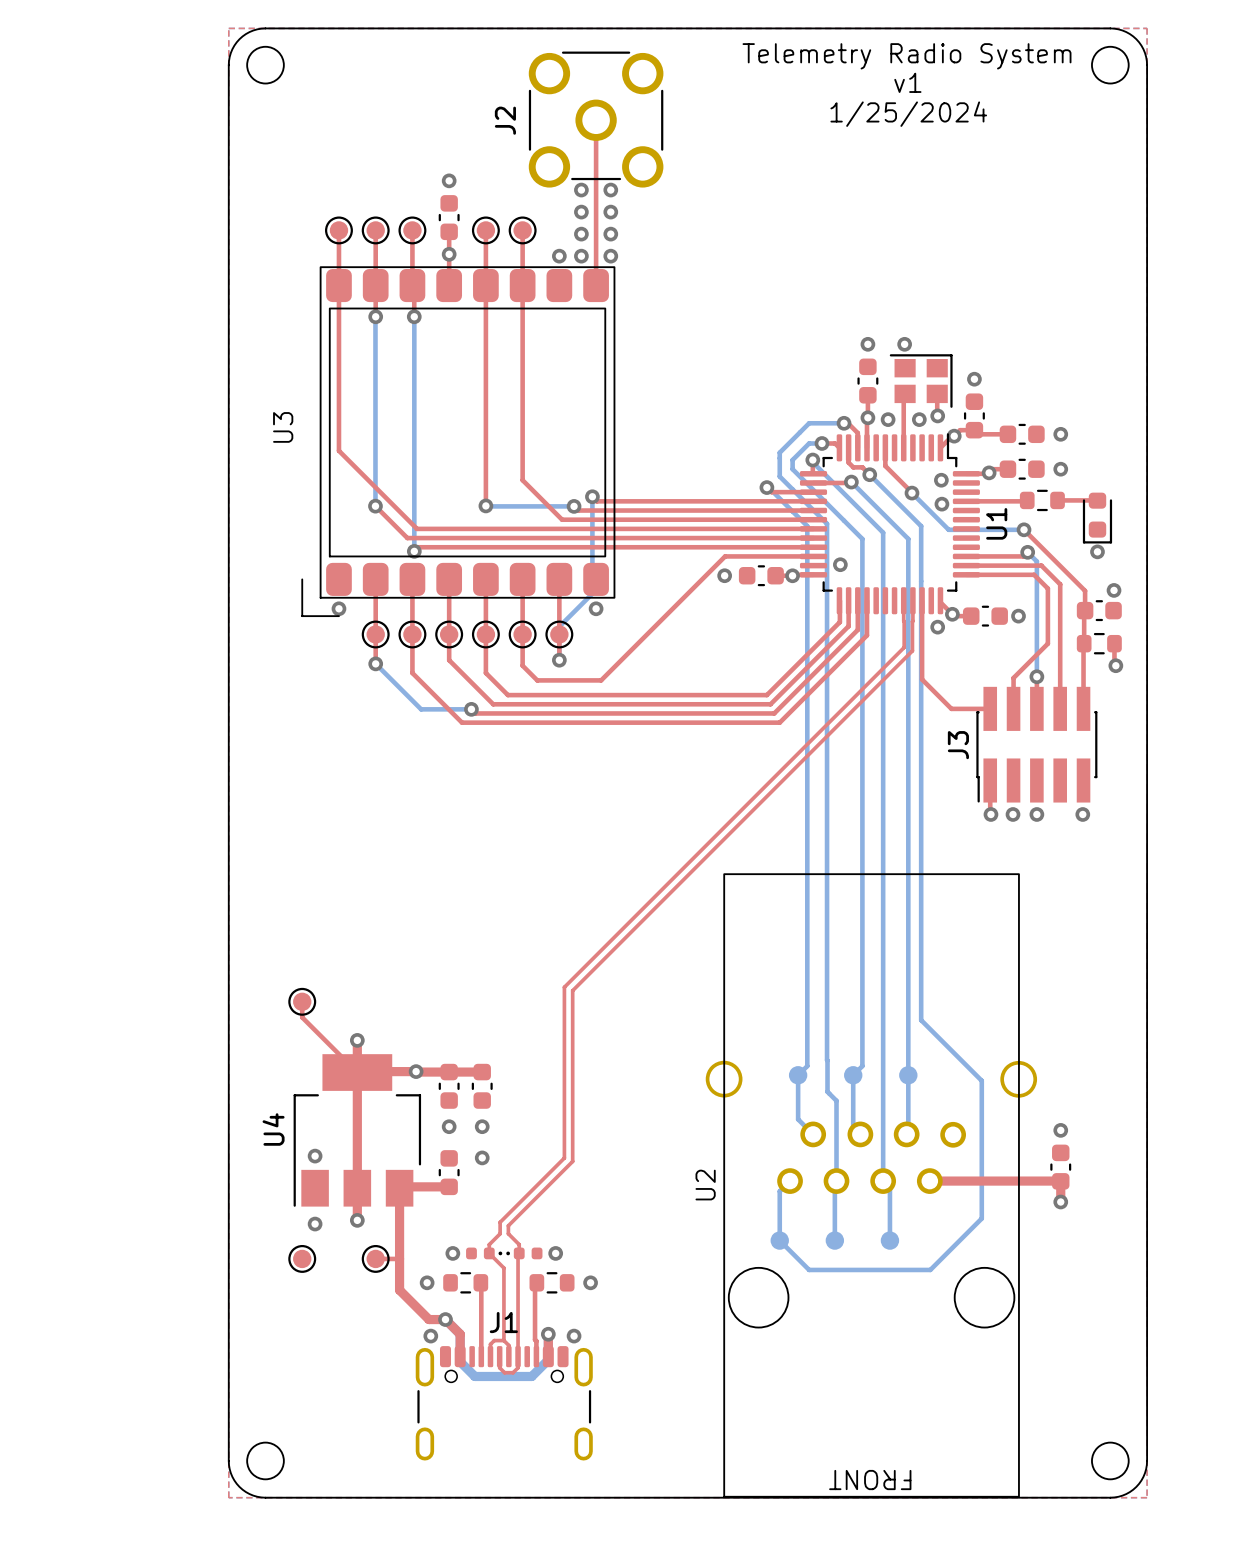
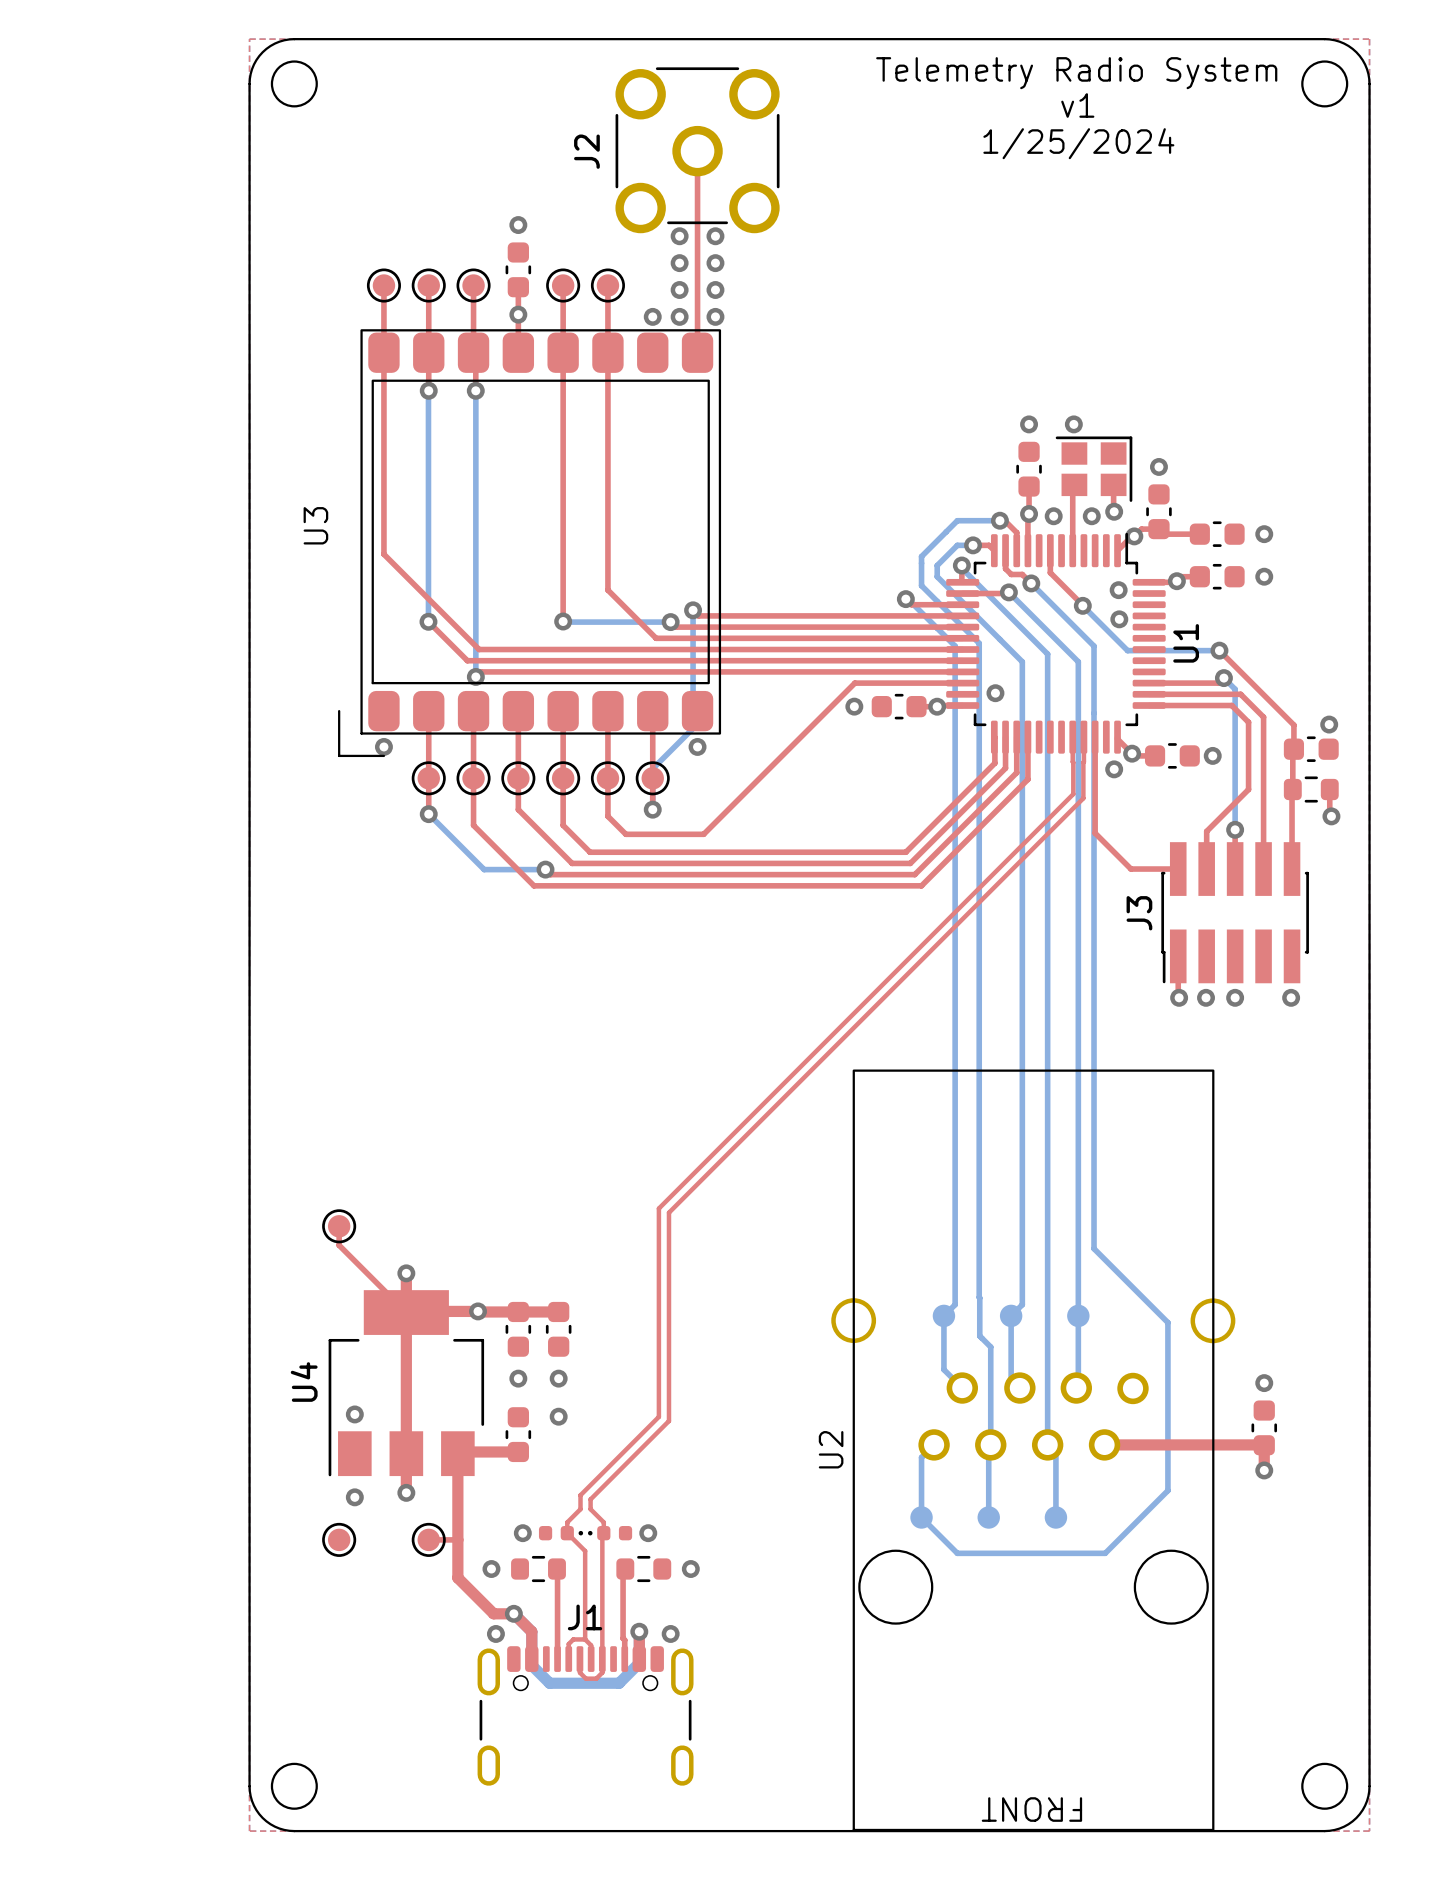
top track: (1027, 500) (966, 501) -> none
part: (1042, 500) -> none
top track: (1057, 500) (1097, 500) -> none
part: (1097, 518) -> none
via: (1097, 551) -> none

